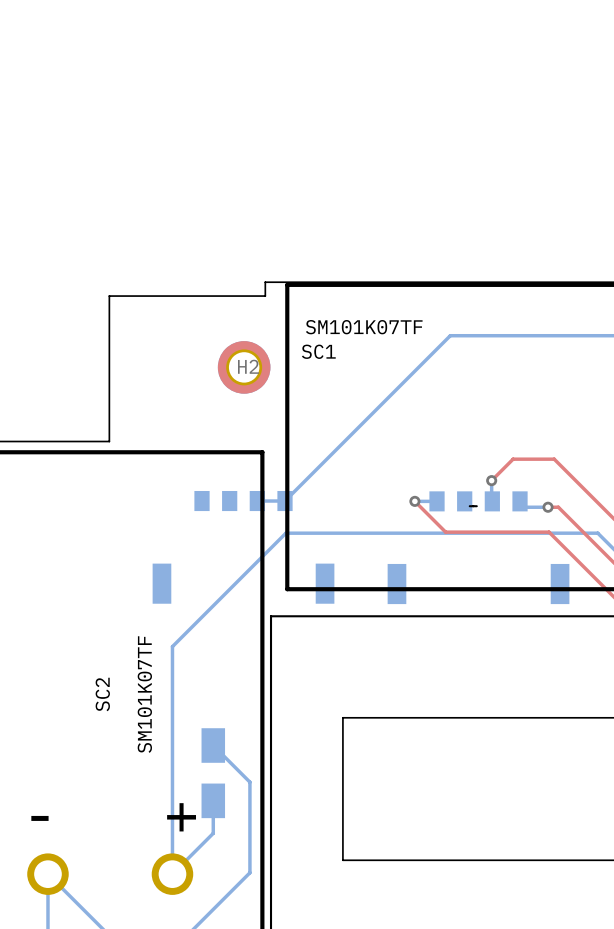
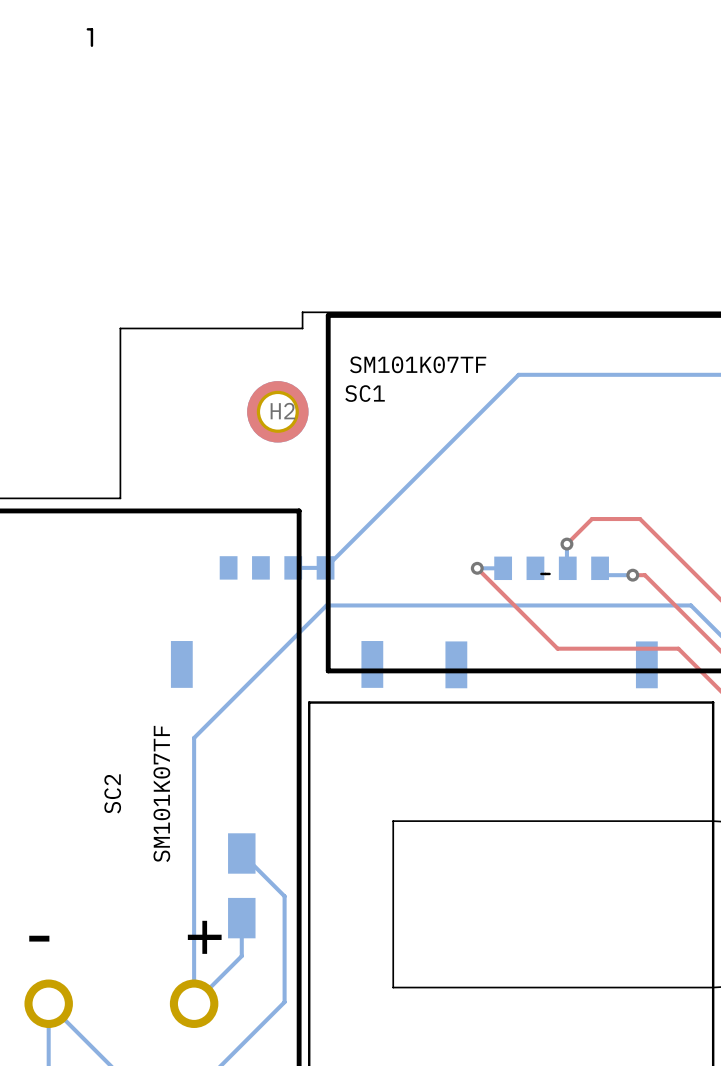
line: none -> (87, 29) (91, 29) (91, 45)
top track: (445, 532) (549, 532) (587, 570) -> (513, 604) (557, 648) (678, 648)

